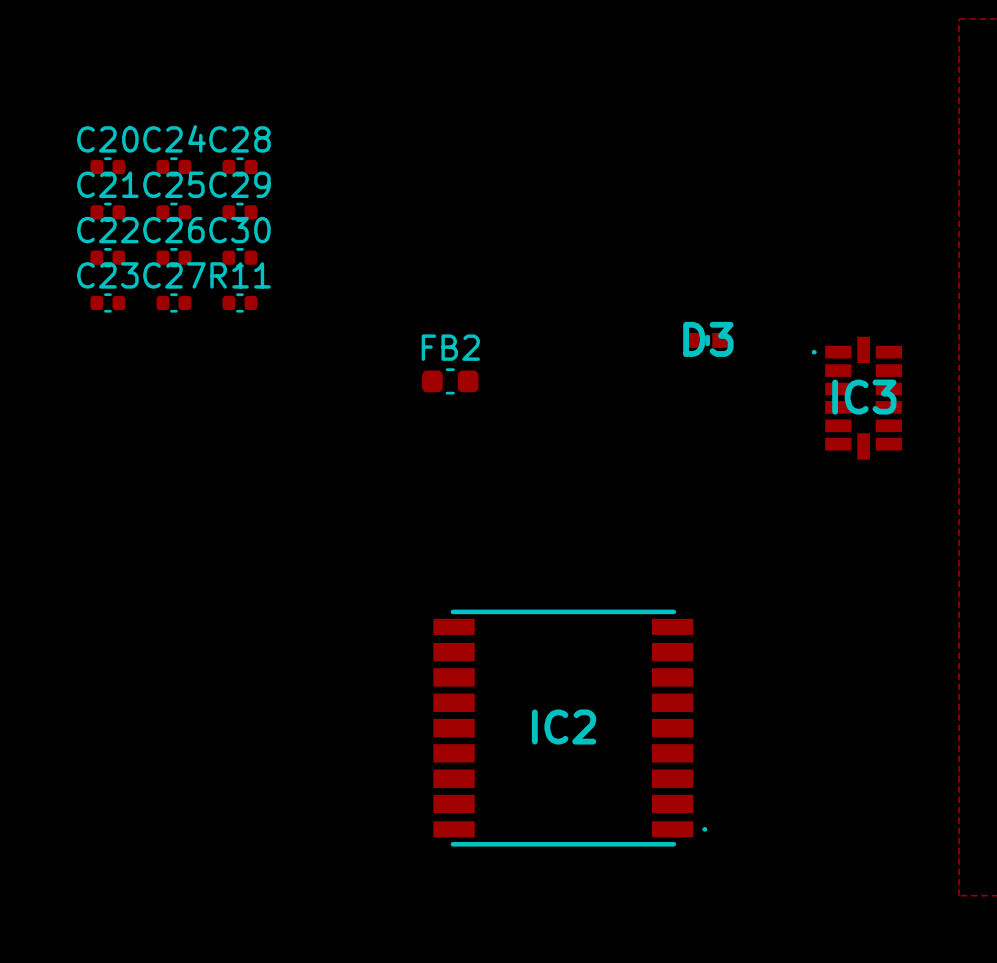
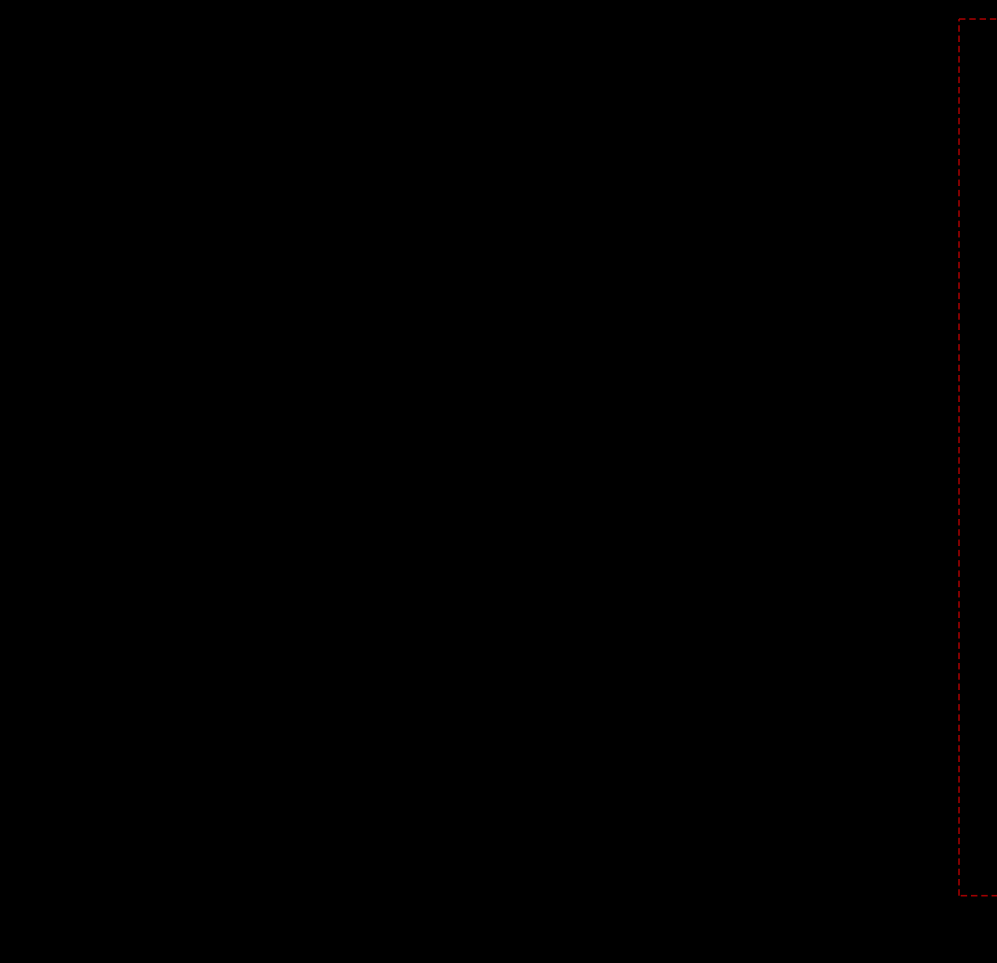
C20: (107, 166) -> none
C24: (173, 166) -> none
C28: (239, 166) -> none
C21: (107, 212) -> none
C25: (173, 212) -> none
C29: (239, 212) -> none
C22: (107, 257) -> none
C26: (173, 257) -> none
C30: (239, 257) -> none
C23: (107, 302) -> none
C27: (173, 302) -> none
R11: (239, 302) -> none
D3: (707, 340) -> none
FB2: (450, 381) -> none
IC3: (856, 398) -> none
IC2: (570, 728) -> none

